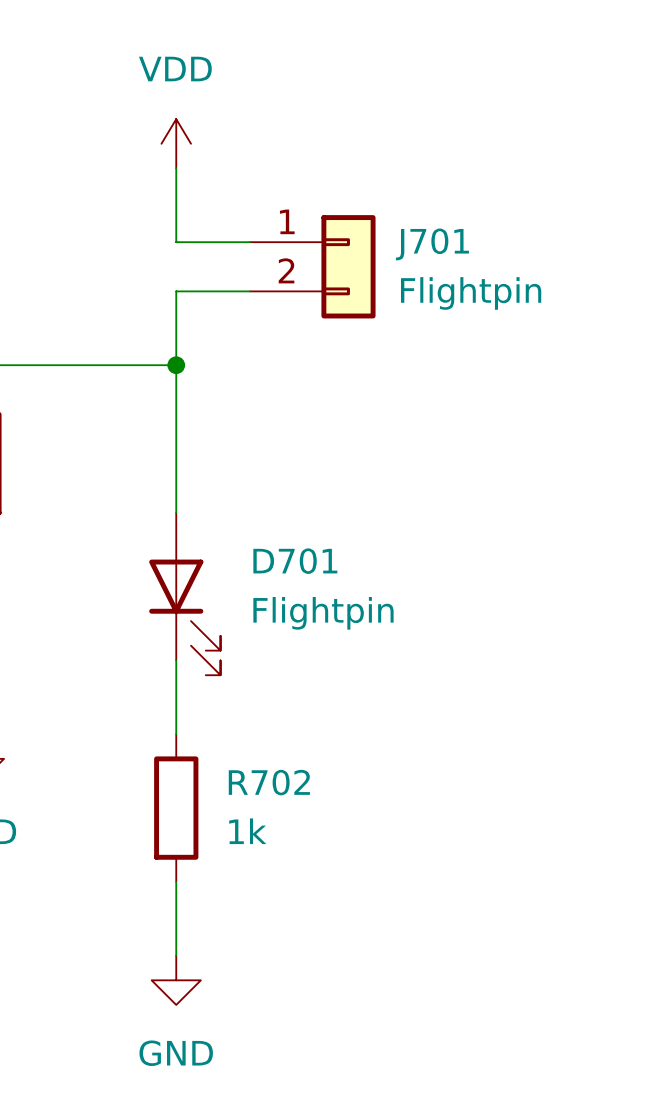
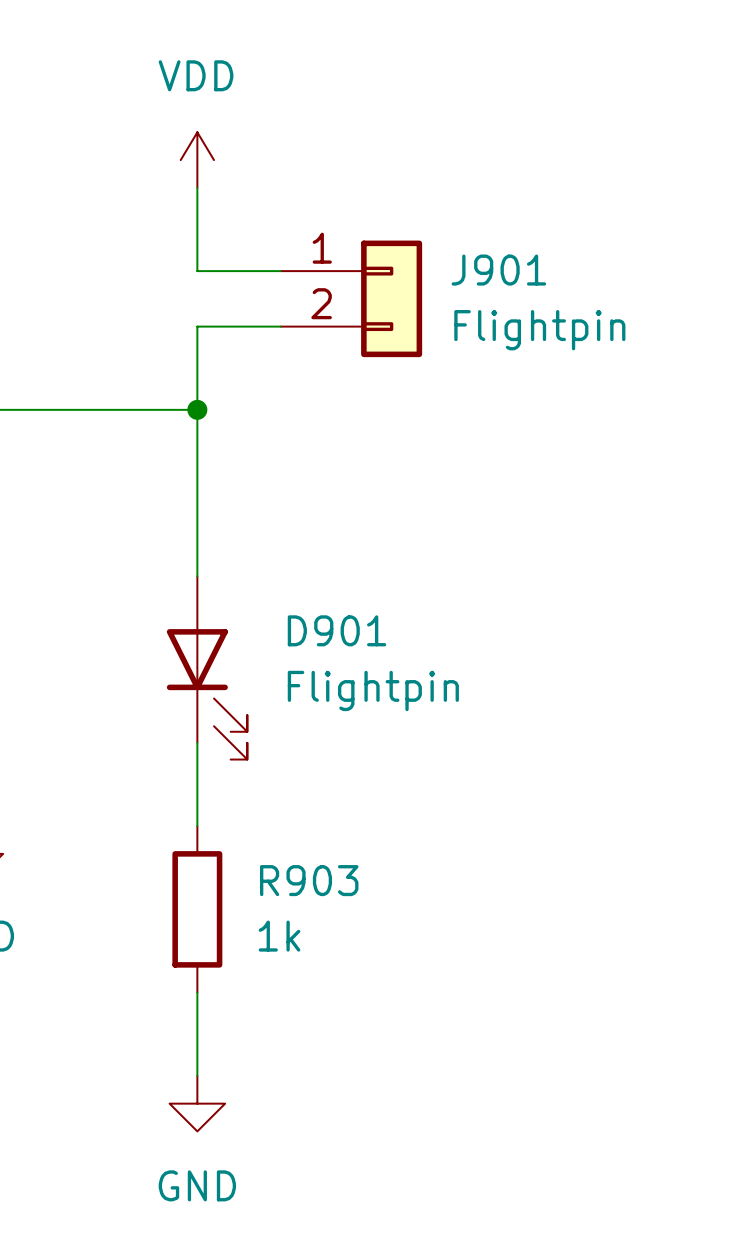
J701 name: J701 (432, 244) -> J901 (498, 270)
D701 name: D701 (295, 561) -> D901 (336, 630)
R702 name: R702 (269, 782) -> R903 (309, 880)

